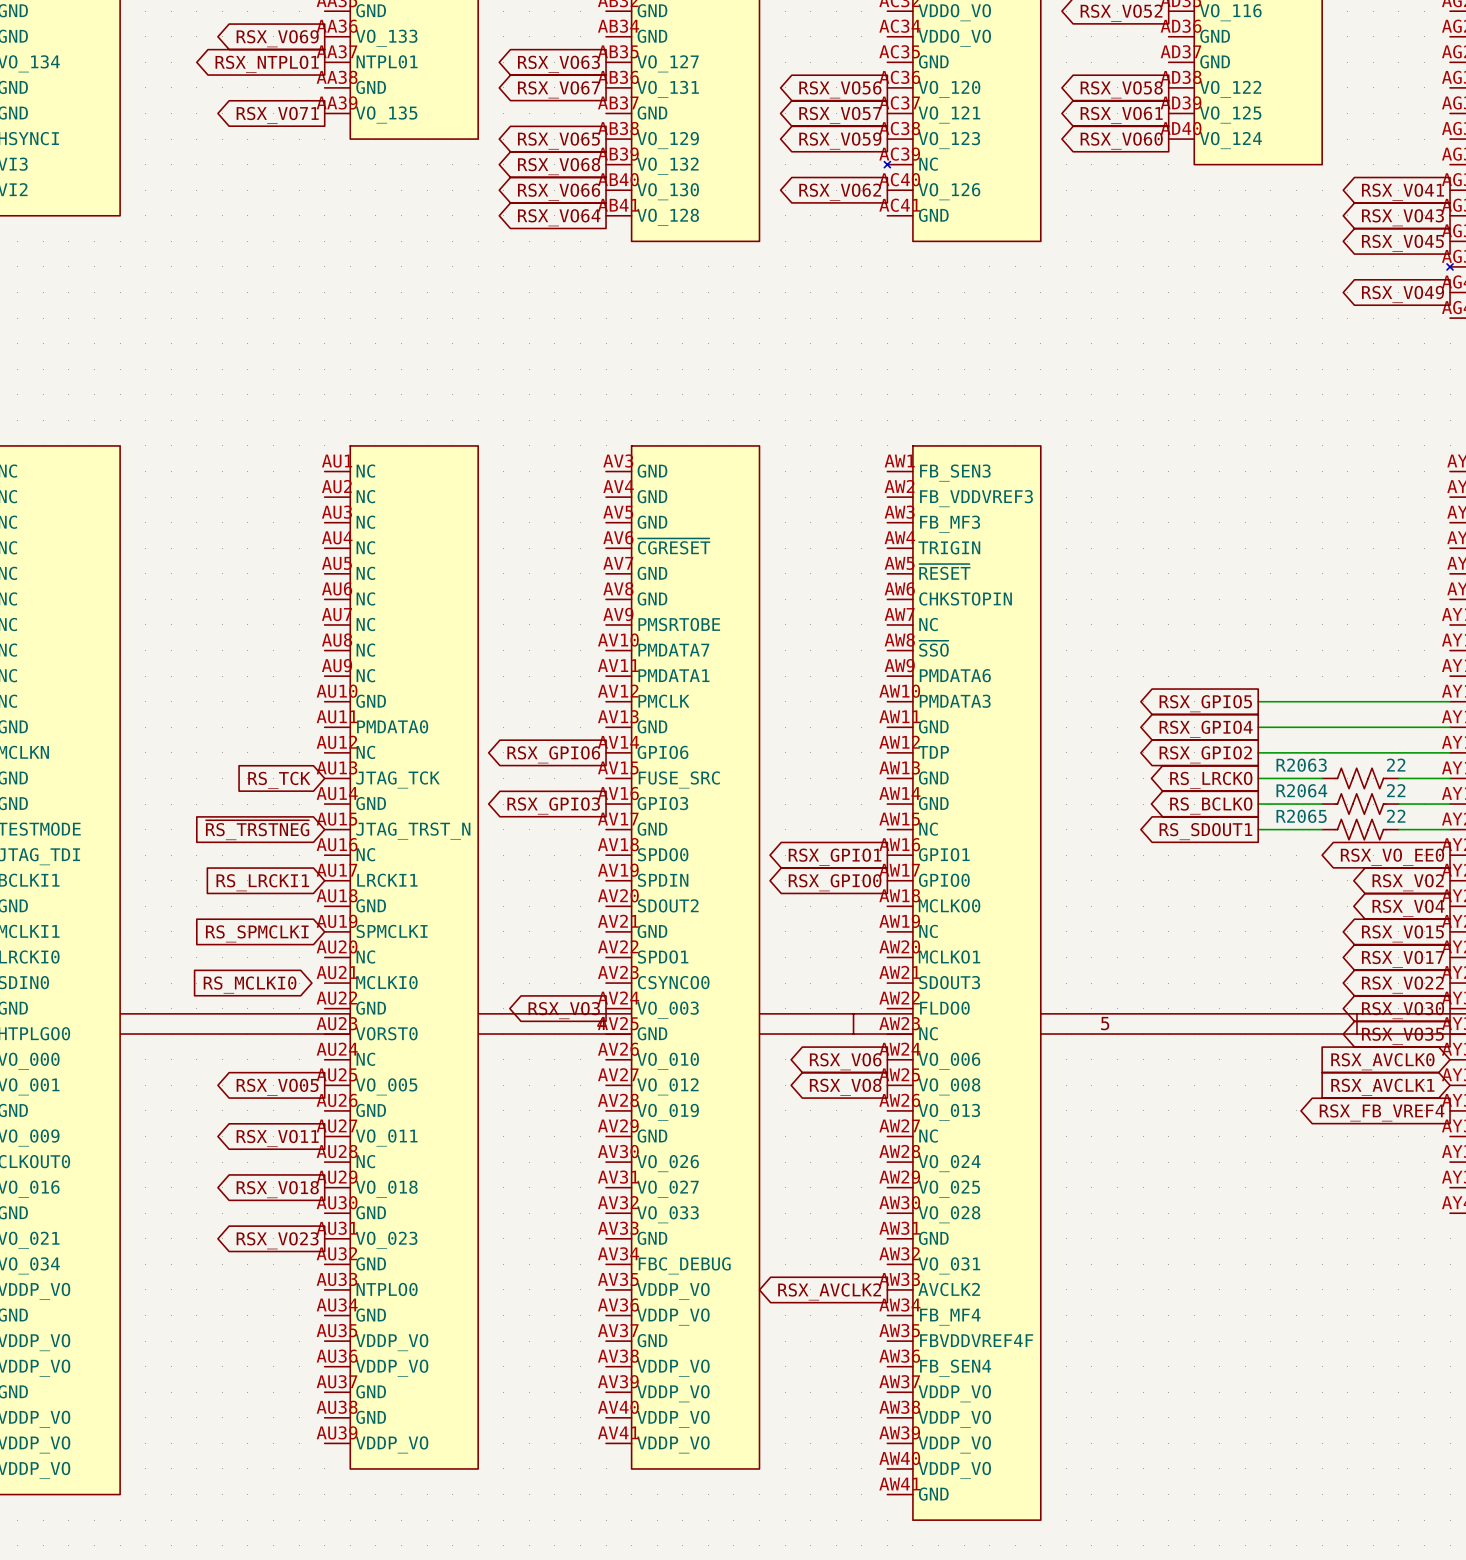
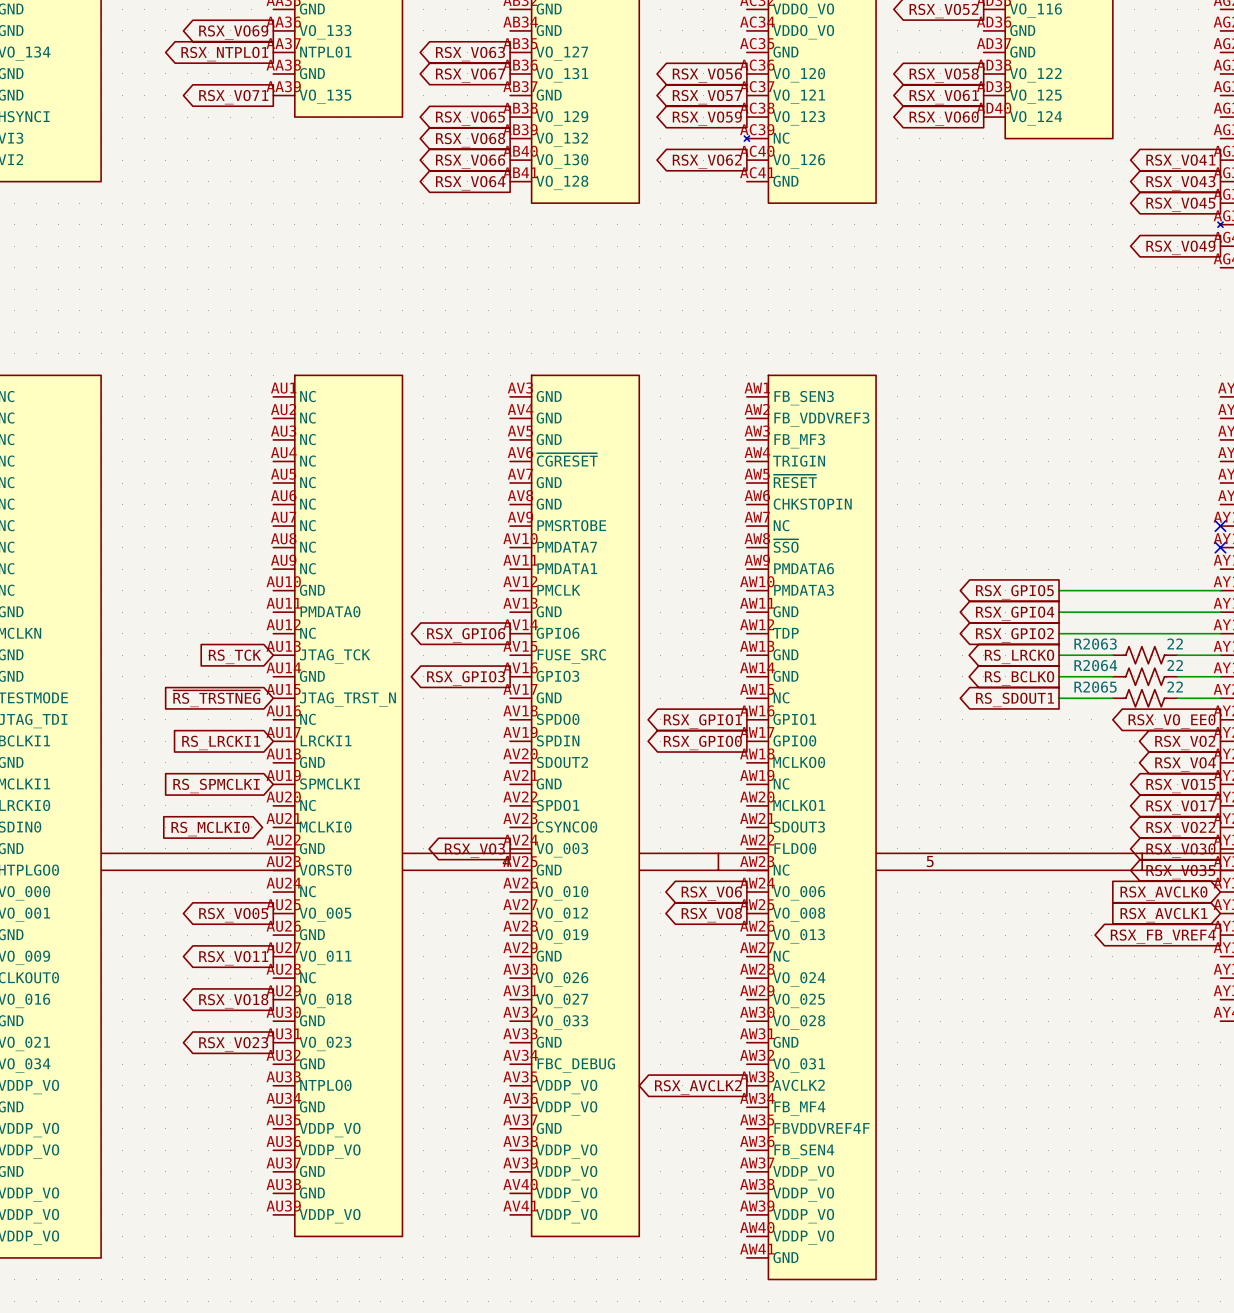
no-connect mark: none -> (1220, 526)
no-connect mark: none -> (1220, 547)

